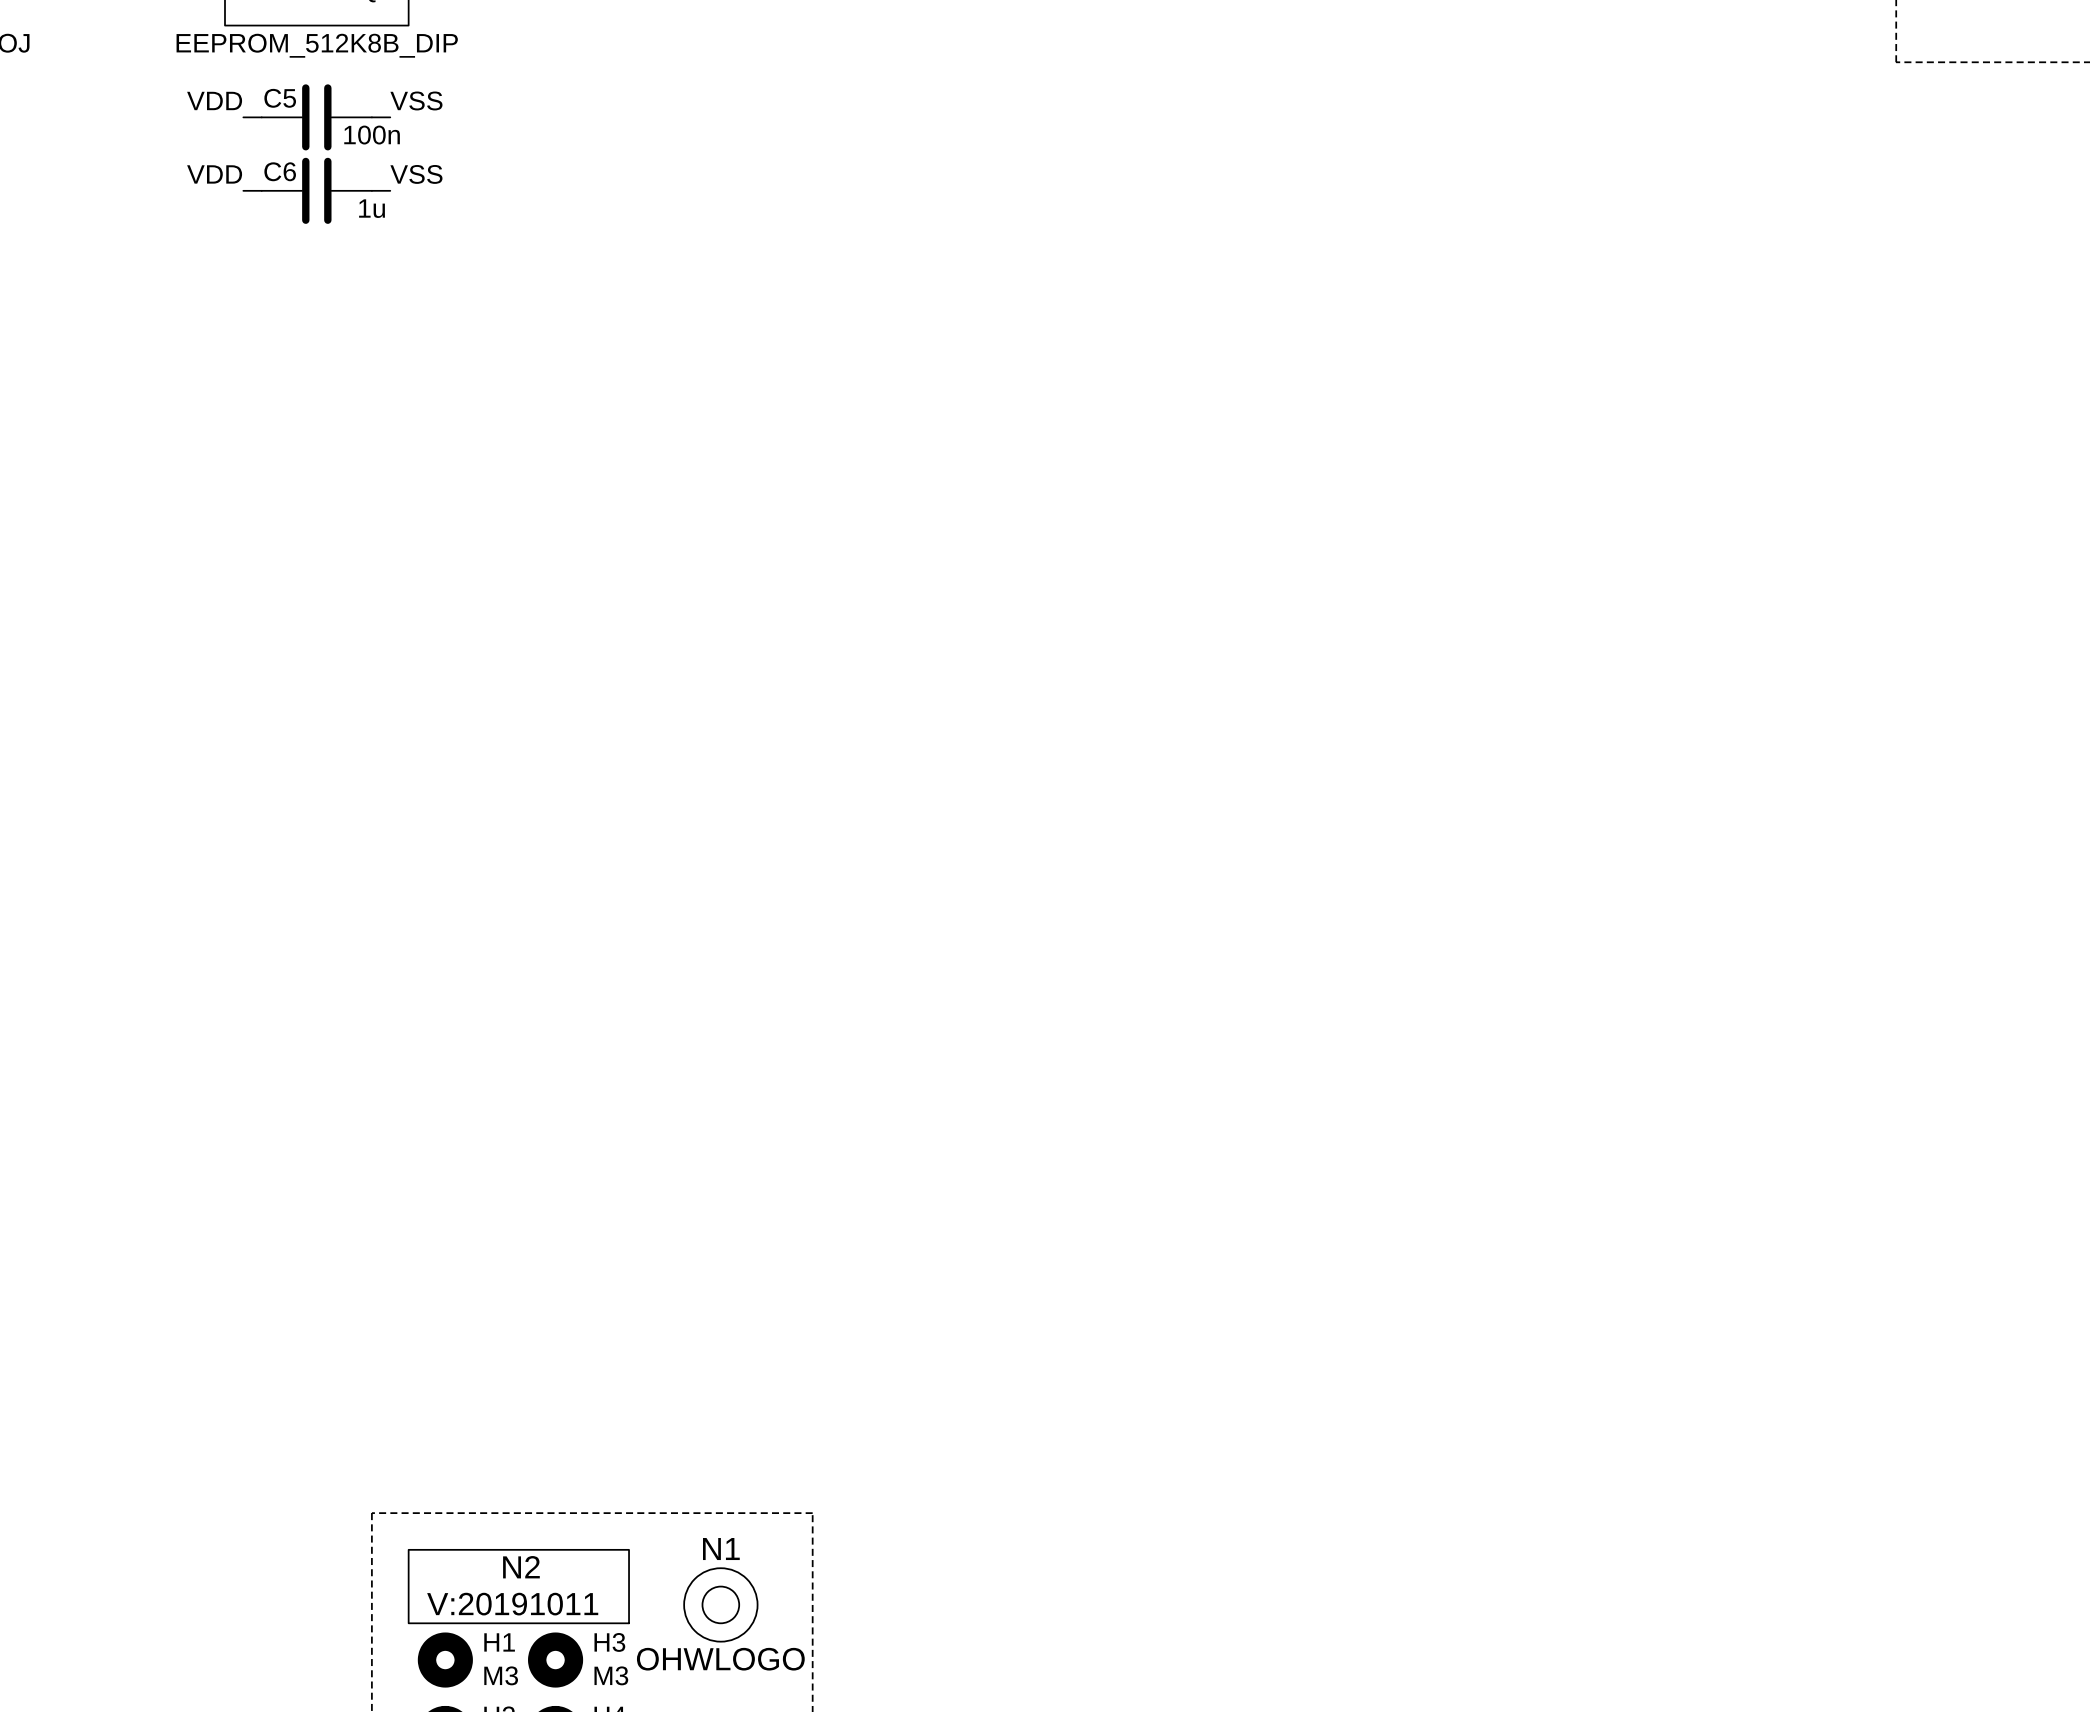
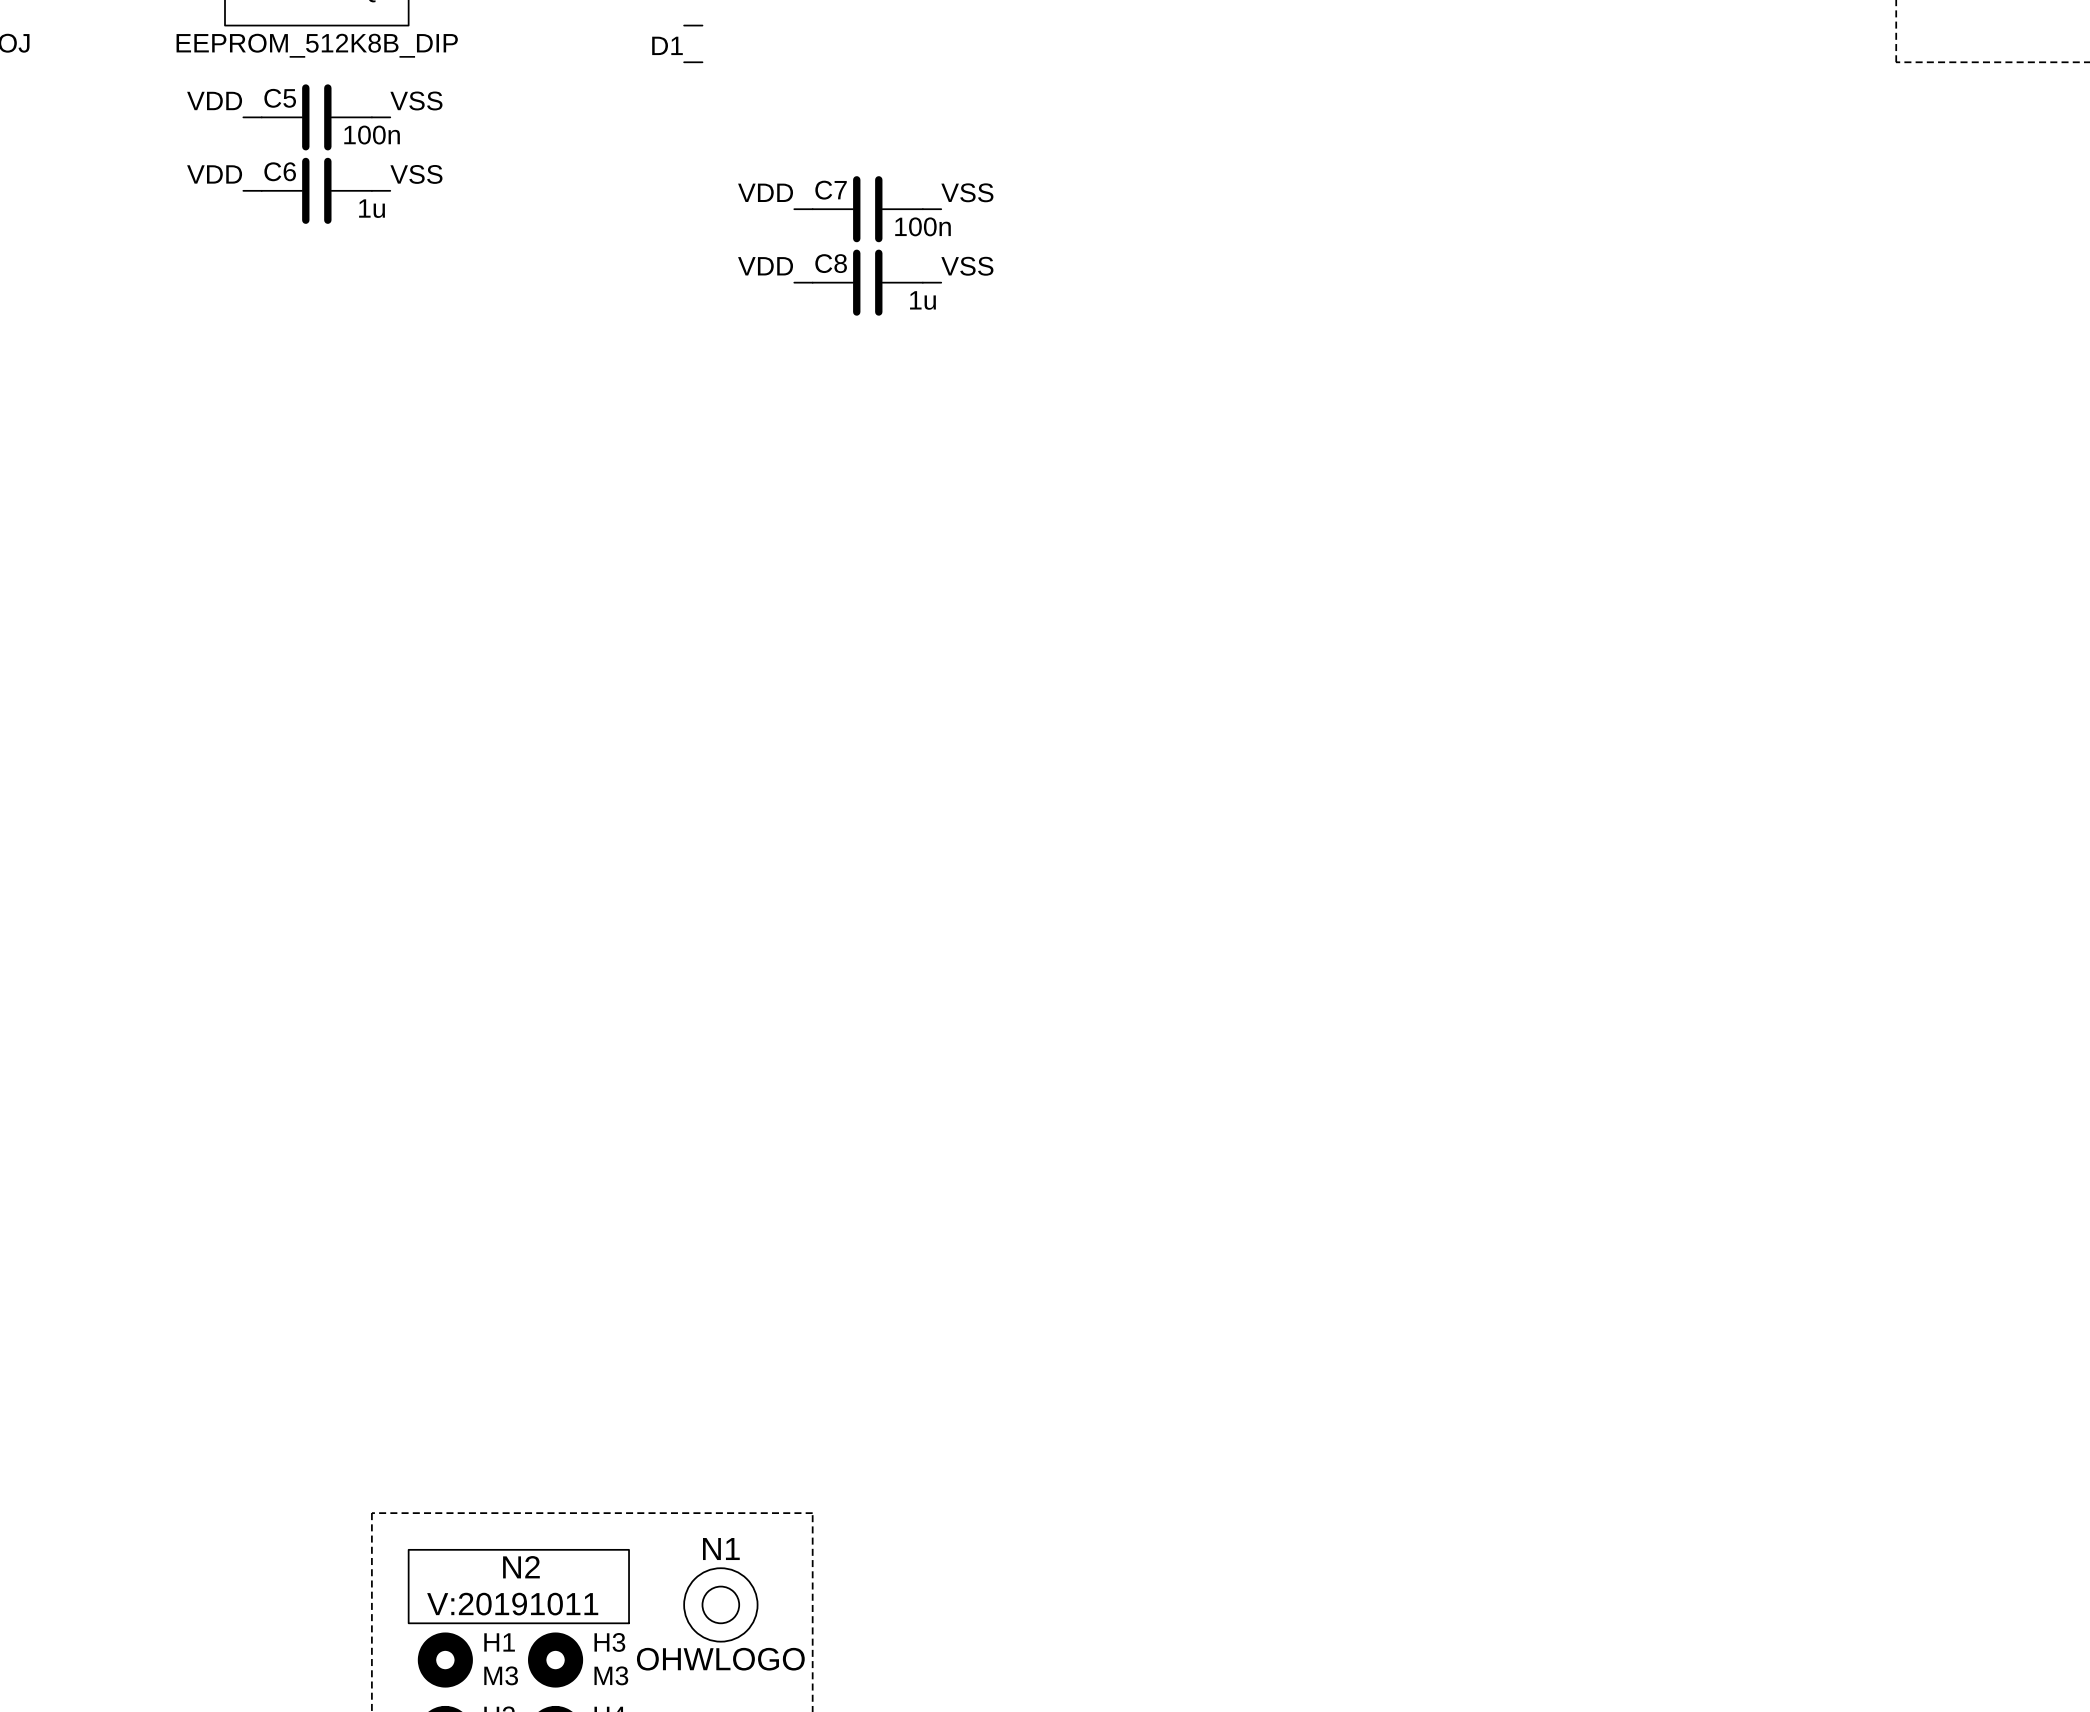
wire: none -> (684, 25) (702, 25)
label: none -> D1 (667, 45)
wire: none -> (684, 62) (702, 62)
label: none -> VDD (765, 192)
label: none -> VSS (967, 192)
wire: none -> (794, 209) (812, 209)
C7: none -> 100n (867, 209)
wire: none -> (922, 209) (941, 209)
label: none -> VDD (765, 266)
label: none -> VSS (967, 266)
wire: none -> (794, 282) (812, 282)
C8: none -> 1u (867, 282)
wire: none -> (922, 282) (941, 282)

